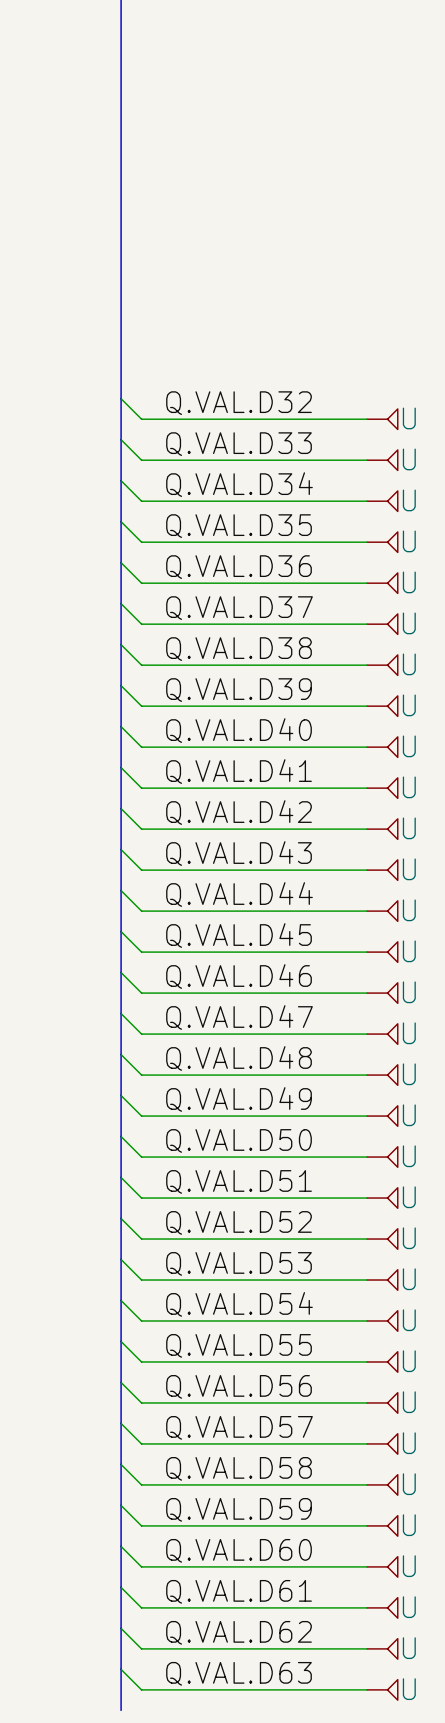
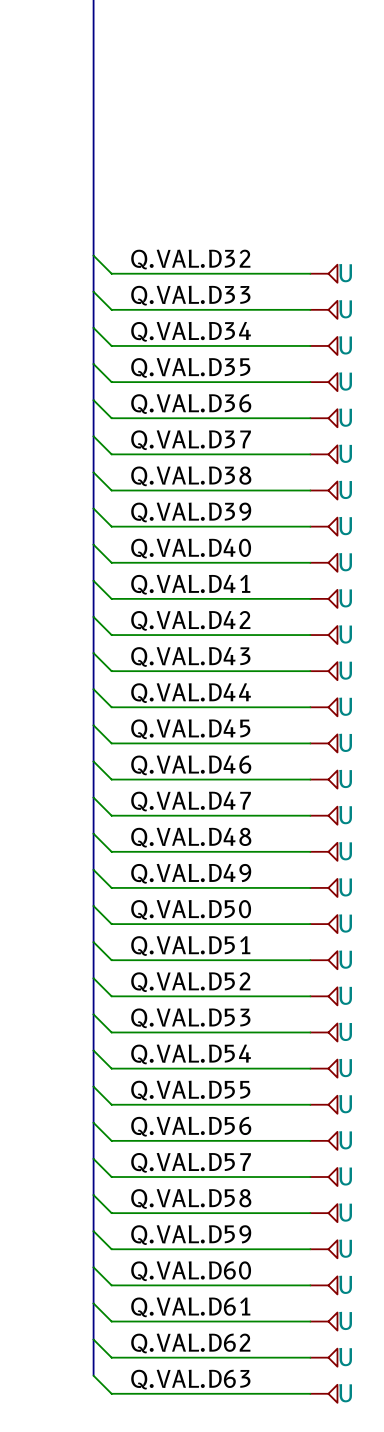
bus: (121, 1669) (121, 1710) -> none

